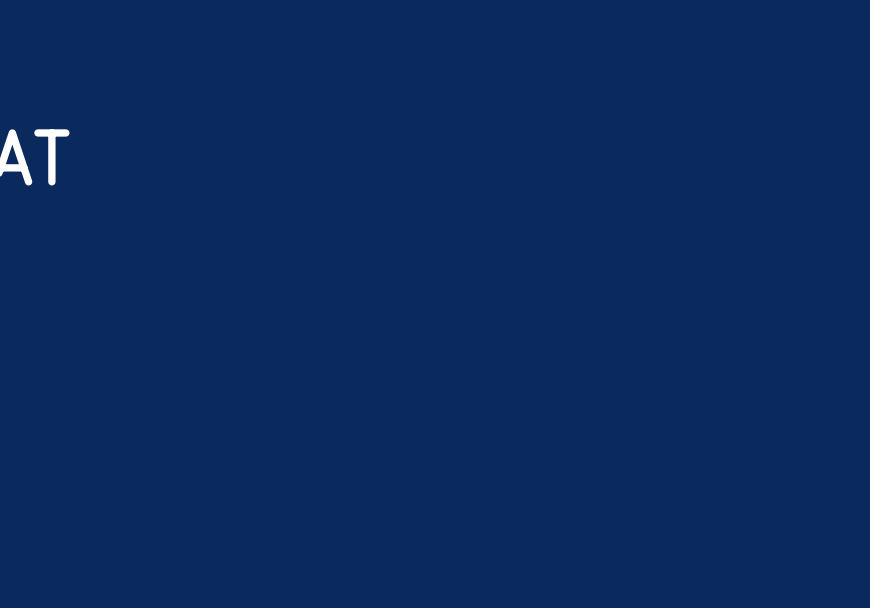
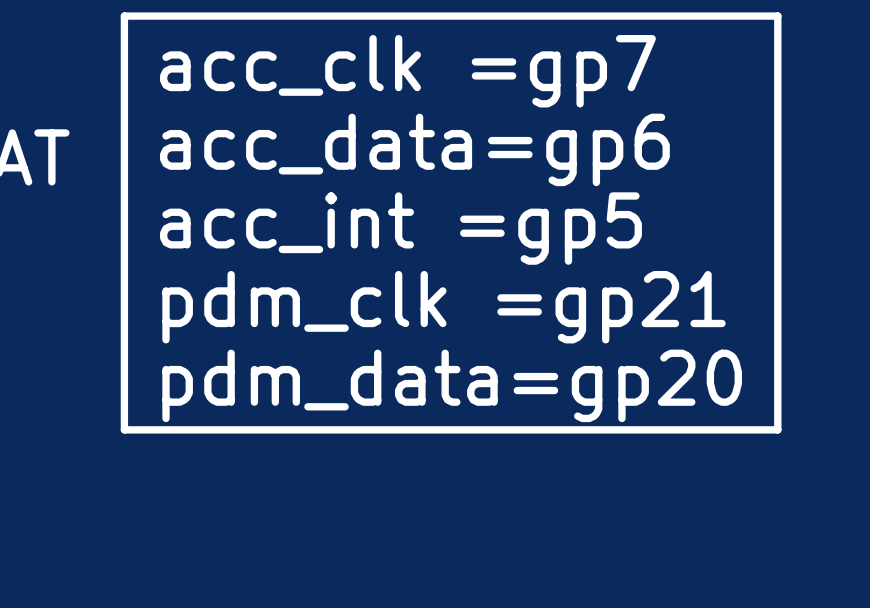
line: none -> (777, 16) (124, 16) (124, 429) (777, 429) (777, 16)
text: none -> acc_clk =gp7 (407, 71)
text: none -> acc_data=gp6 (414, 149)
text: none -> acc_int =gp5 (400, 228)
text: none -> pdm_clk =gp21 (444, 307)
text: none -> pdm_data=gp20 (452, 385)

